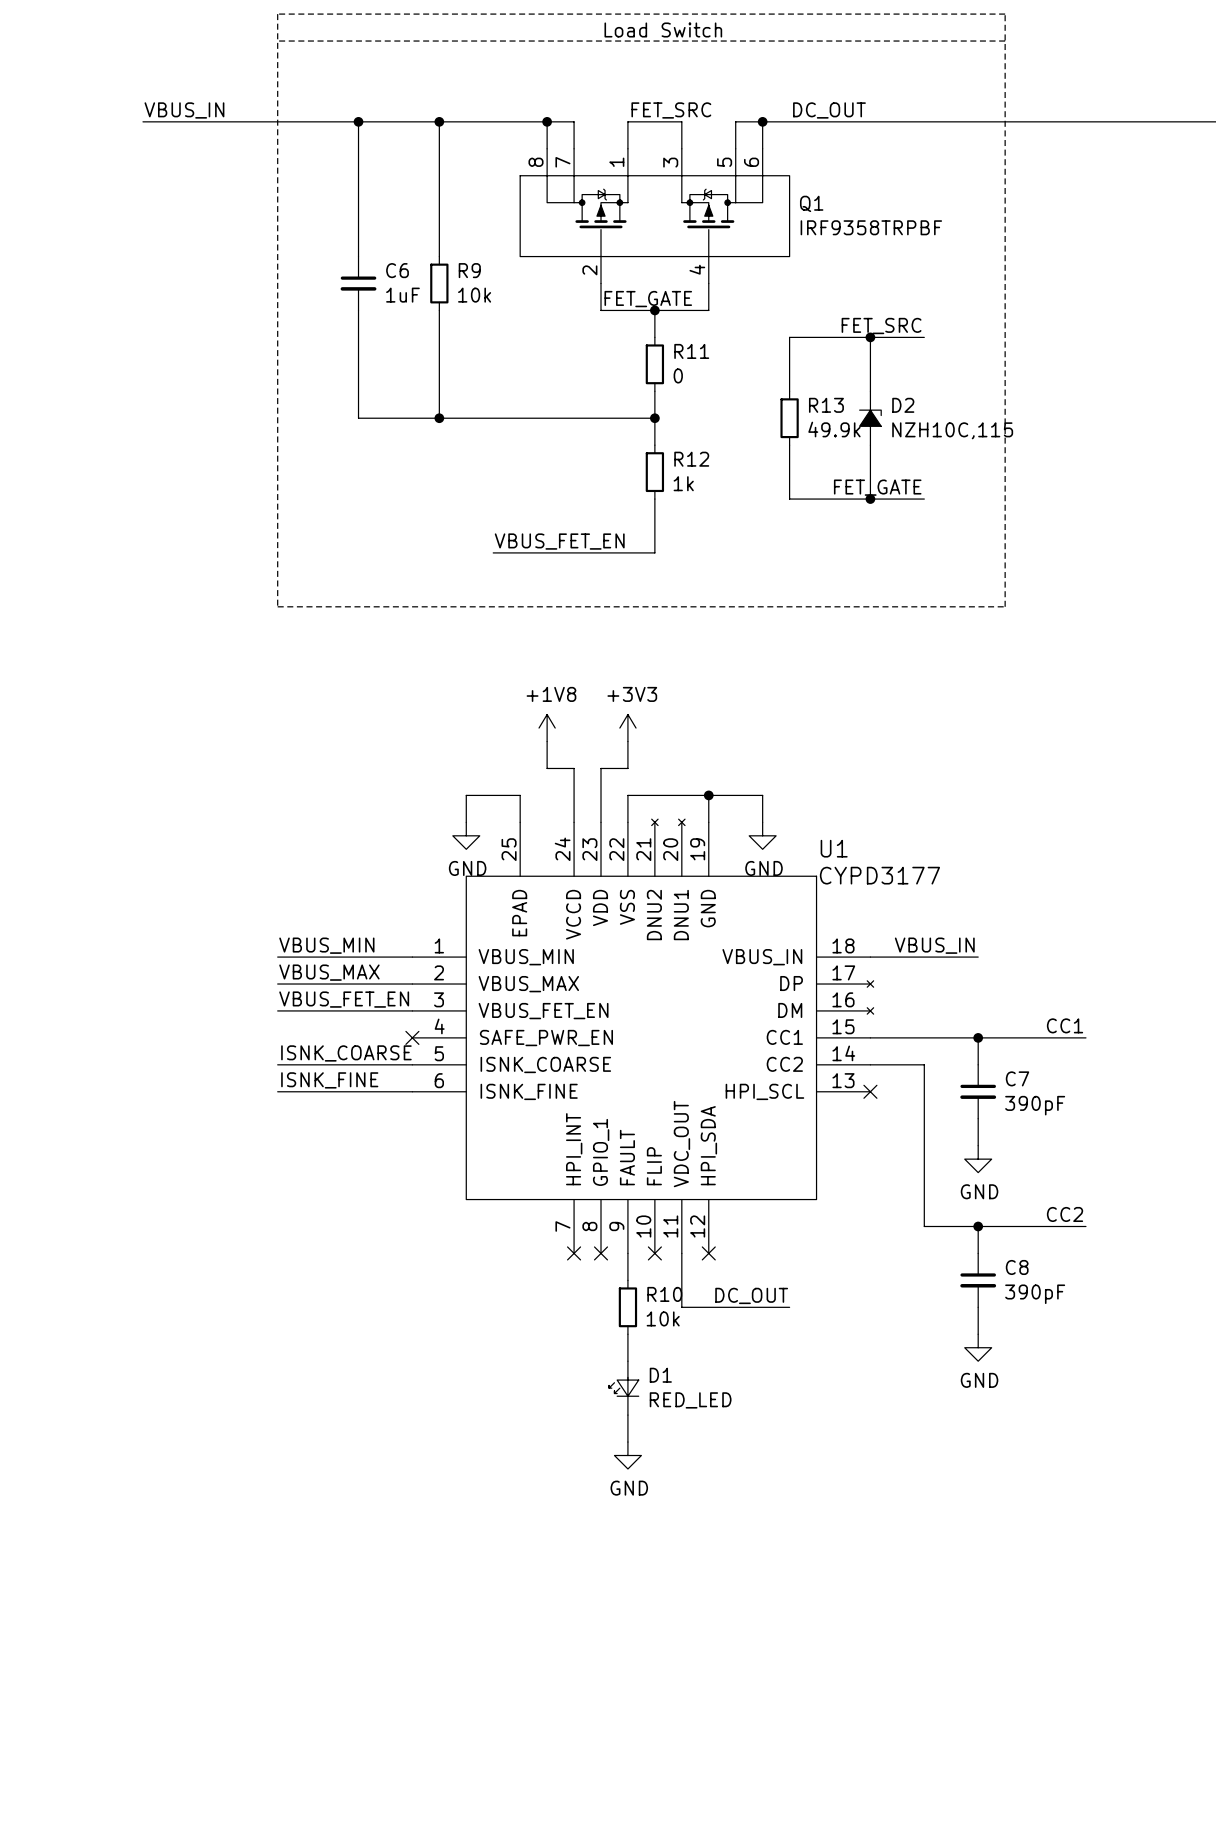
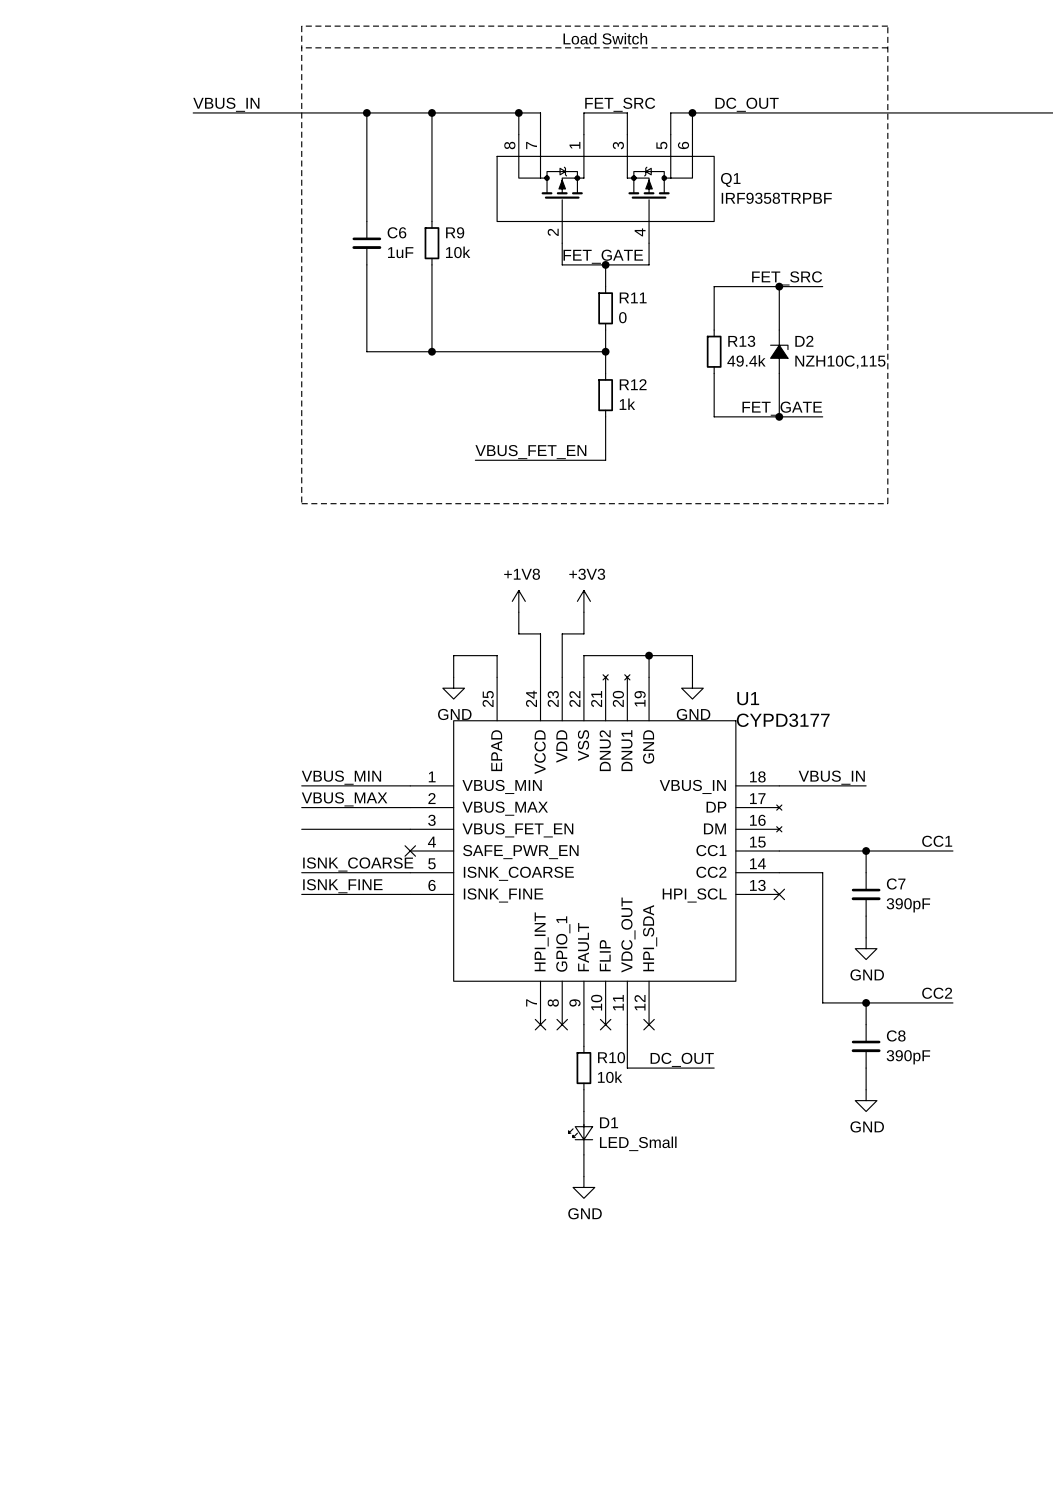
R13 value: 49.9k (834, 429) -> 49.4k (746, 360)
label: VBUS_FET_EN (344, 999) -> none
D1 value: RED_LED (690, 1400) -> LED_Small (638, 1143)

